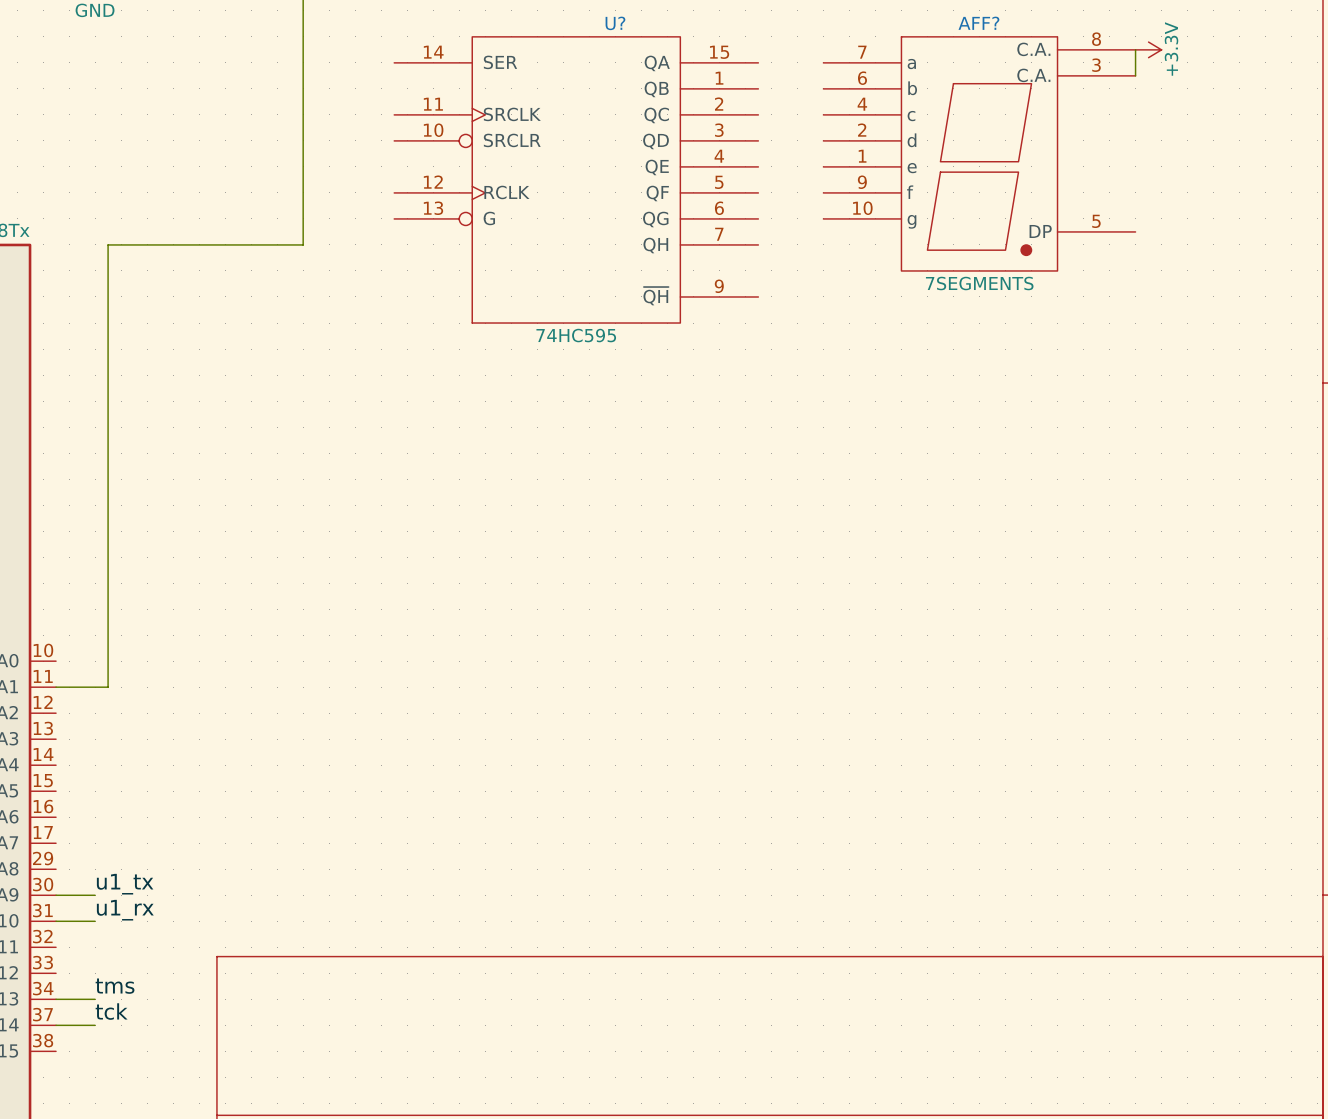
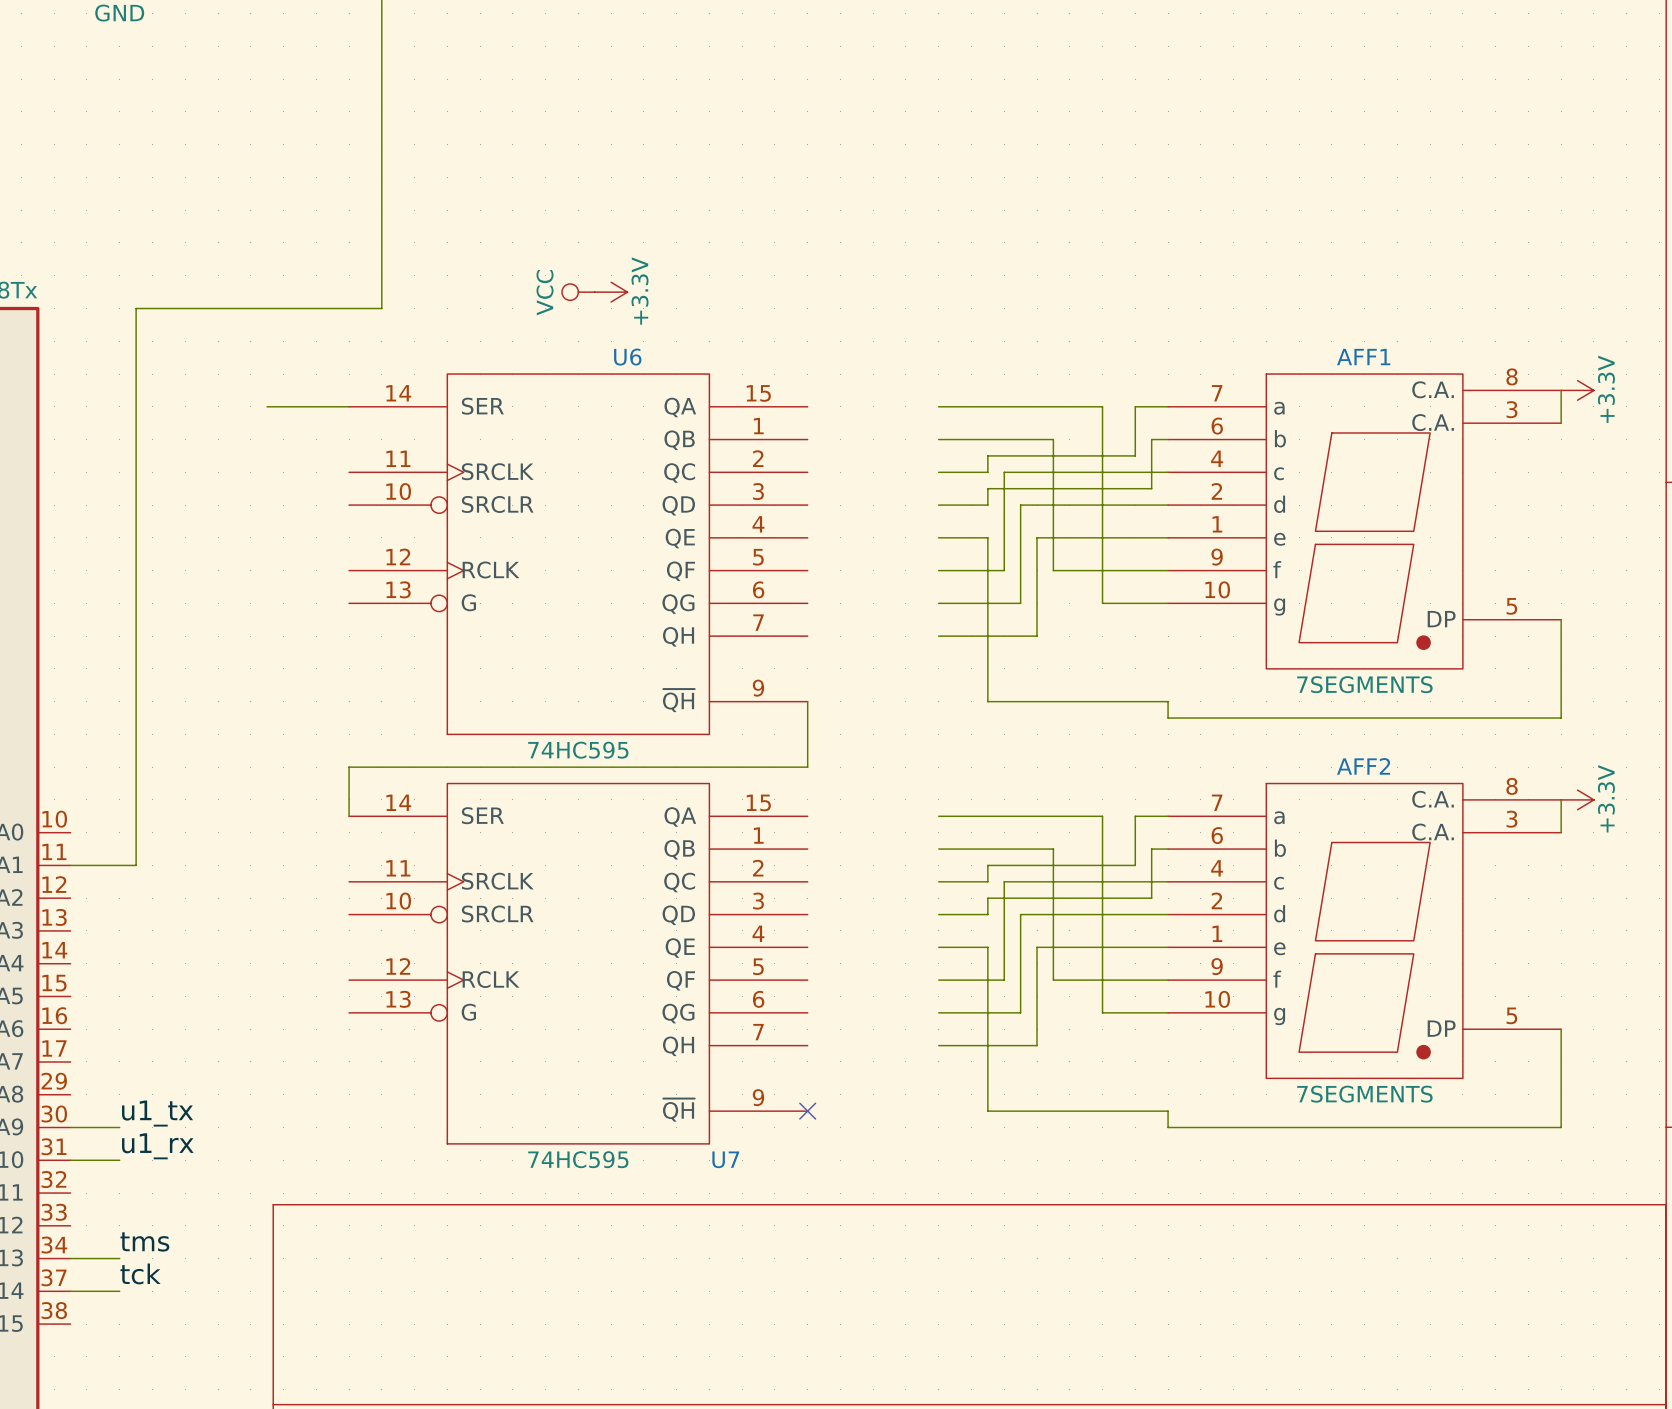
wire: (1135, 49) (1135, 75) -> none
power symbol: +3.3V (1148, 49) -> none
AFF?: 7SEGMENTS (979, 153) -> none
U?: 74HC595 (576, 179) -> none
power symbol: none -> VCC (578, 292)
power symbol: none -> +3.3V (611, 292)
wire: none -> (1561, 390) (1561, 423)
power symbol: none -> +3.3V (1577, 390)
wire: none -> (267, 406) (349, 406)
wire: none -> (938, 406) (1102, 406) (1102, 603) (1168, 603)
wire: none -> (1168, 406) (1135, 406) (1135, 455) (987, 455) (987, 472) (938, 472)
wire: none -> (938, 439) (1053, 439) (1053, 570) (1168, 570)
wire: none -> (1168, 439) (1151, 439) (1151, 488) (987, 488) (987, 505) (938, 505)
wire: none -> (1168, 472) (1004, 472) (1004, 570) (938, 570)
wire: none -> (1168, 505) (1020, 505) (1020, 603) (938, 603)
AFF1: none -> 7SEGMENTS (1364, 521)
wire: none -> (938, 537) (987, 537) (987, 701) (1168, 701) (1168, 718) (1561, 718) (1561, 619)
wire: none -> (1168, 537) (1037, 537) (1037, 636) (938, 636)
U6: none -> 74HC595 (578, 554)
wire: none -> (807, 701) (807, 767) (349, 767) (349, 816)
wire: none -> (1561, 799) (1561, 832)
power symbol: none -> +3.3V (1577, 799)
wire: none -> (938, 816) (1102, 816) (1102, 1012) (1168, 1012)
wire: none -> (1168, 816) (1135, 816) (1135, 865) (987, 865) (987, 881) (938, 881)
wire: none -> (938, 849) (1053, 849) (1053, 980) (1168, 980)
wire: none -> (1168, 849) (1151, 849) (1151, 898) (987, 898) (987, 914) (938, 914)
wire: none -> (1168, 881) (1004, 881) (1004, 980) (938, 980)
wire: none -> (1168, 914) (1020, 914) (1020, 1012) (938, 1012)
AFF2: none -> 7SEGMENTS (1364, 930)
wire: none -> (938, 947) (987, 947) (987, 1111) (1168, 1111) (1168, 1127) (1561, 1127) (1561, 1029)
wire: none -> (1168, 947) (1037, 947) (1037, 1045) (938, 1045)
U7: none -> 74HC595 (578, 963)
no-connect mark: none -> (807, 1111)

